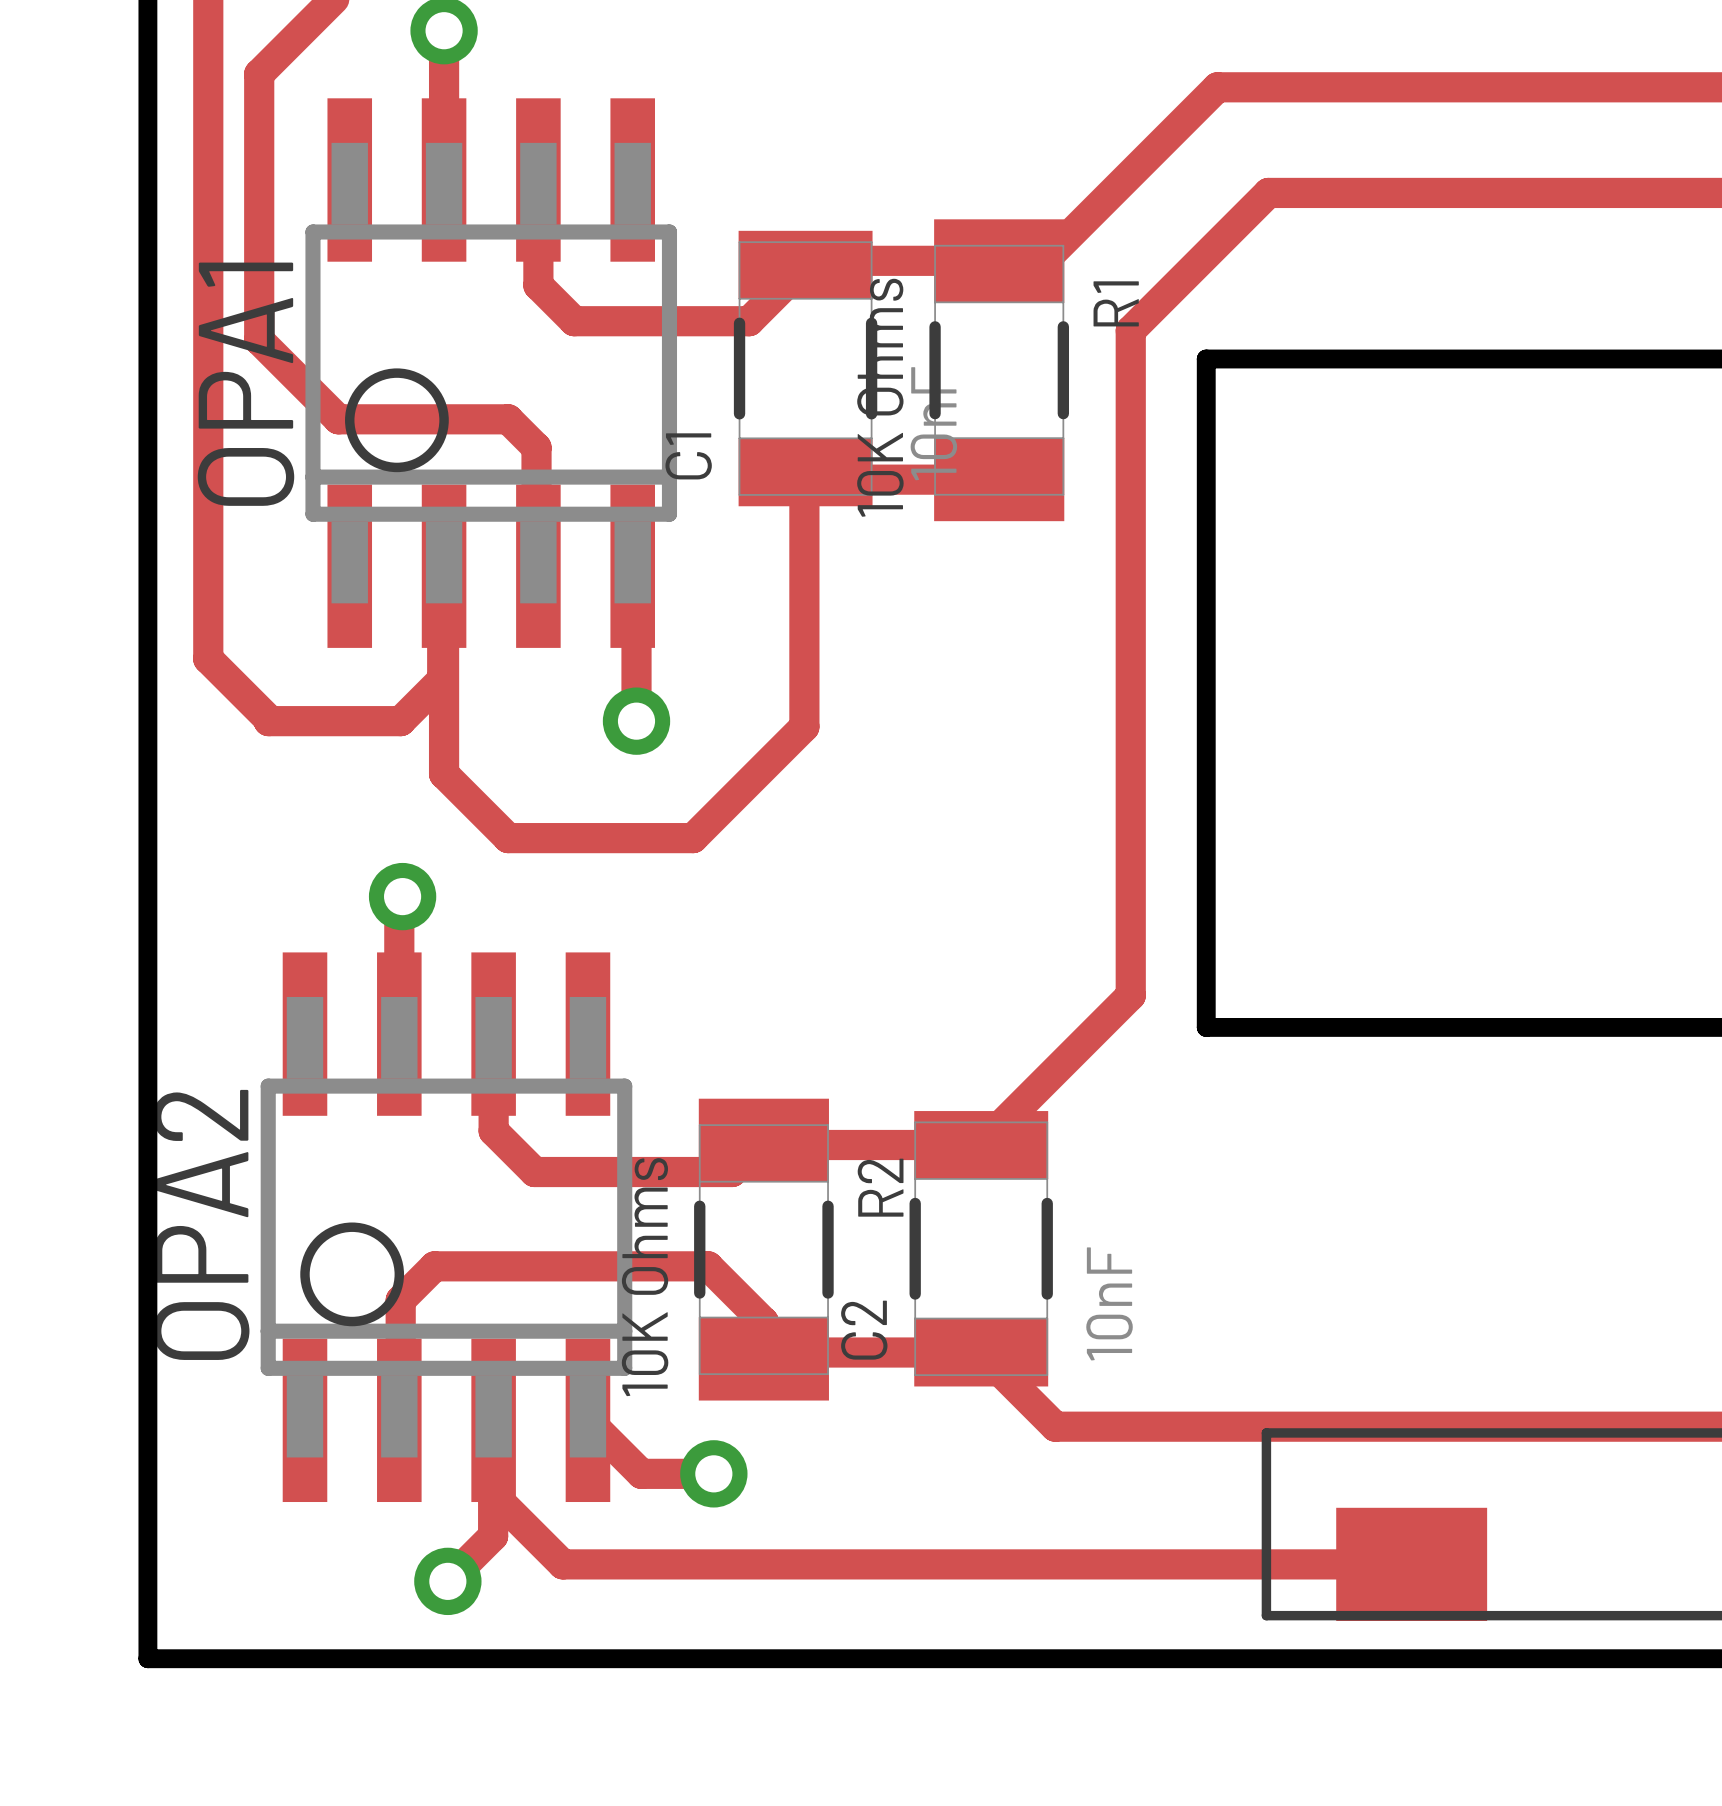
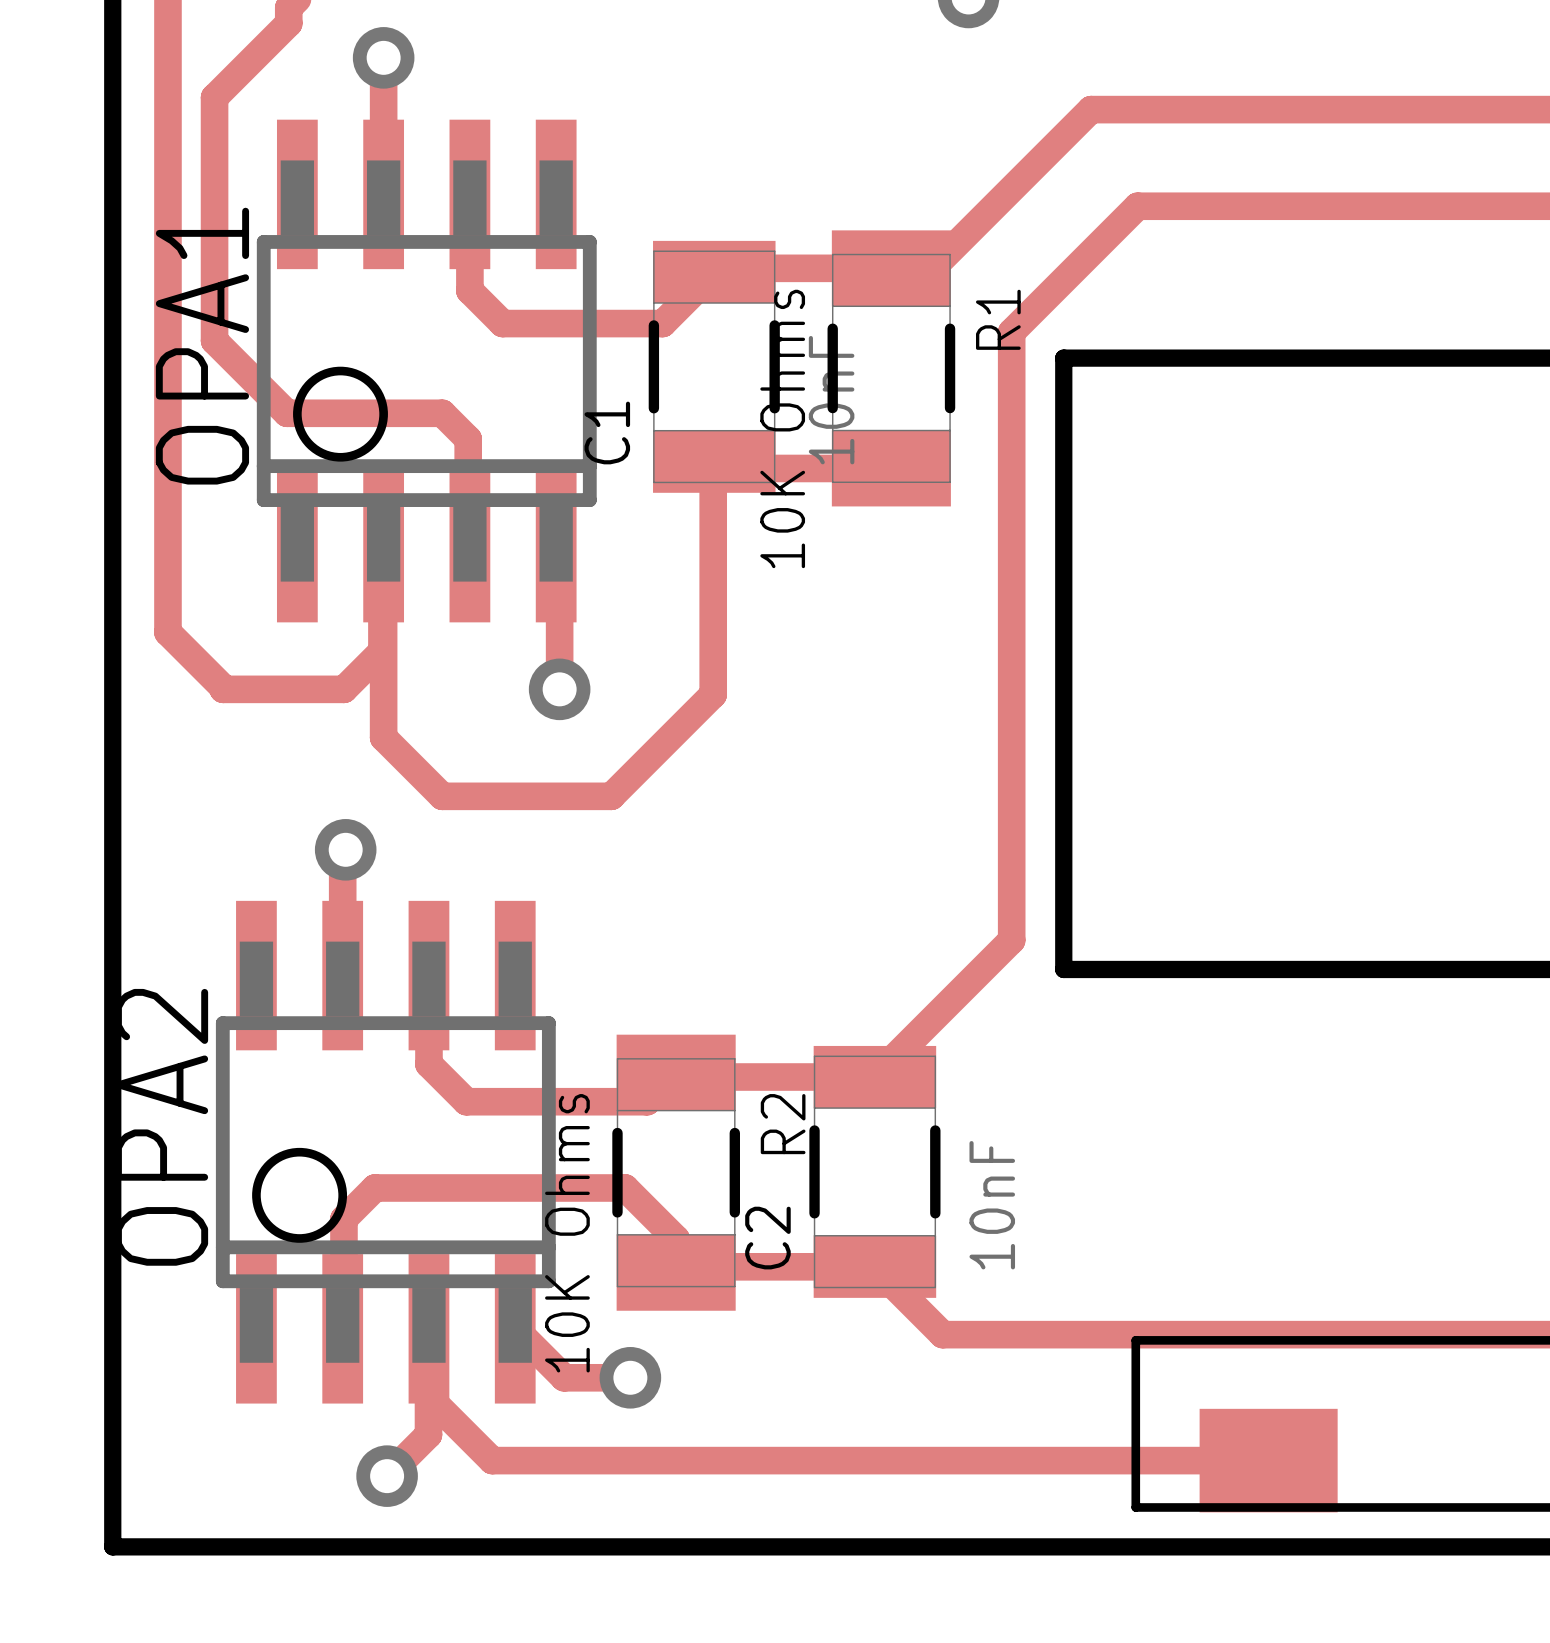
board edge: (1206, 359) (1206, 1027) -> (1080, 358) (1063, 358) (1063, 969) (1080, 969)

